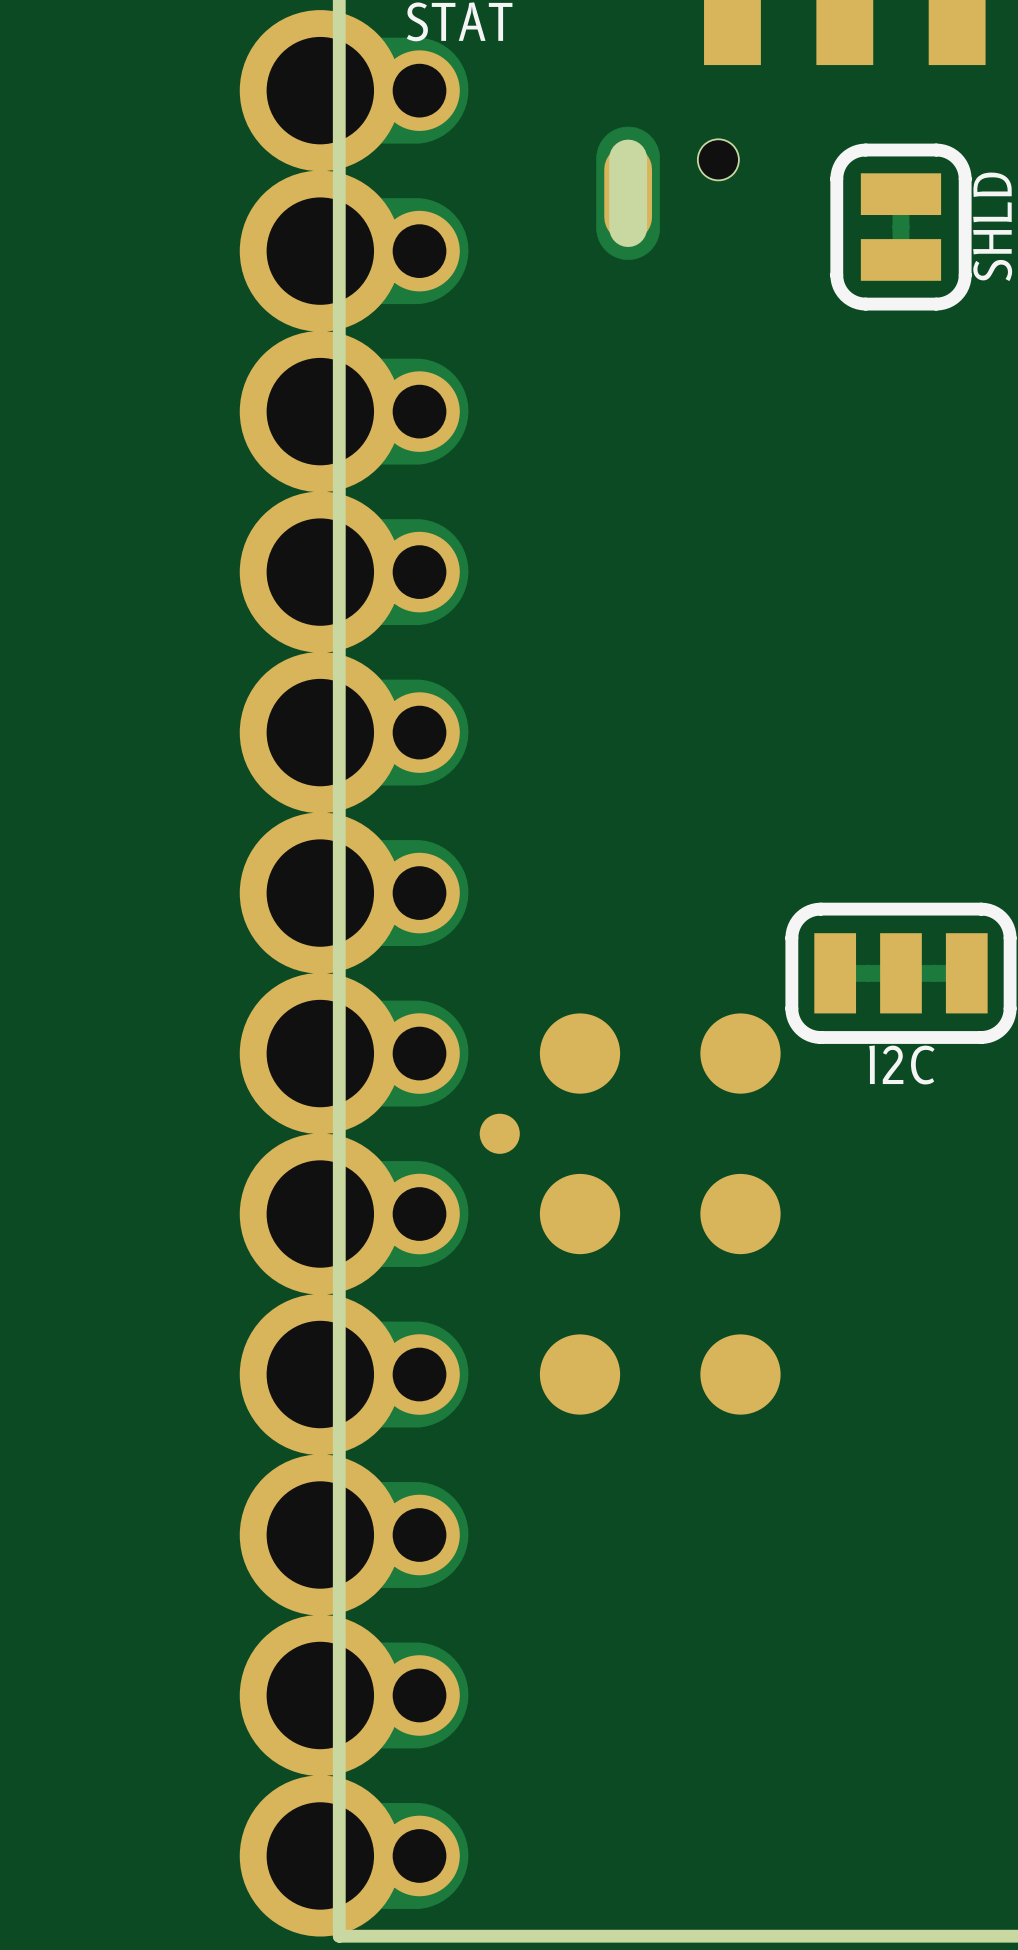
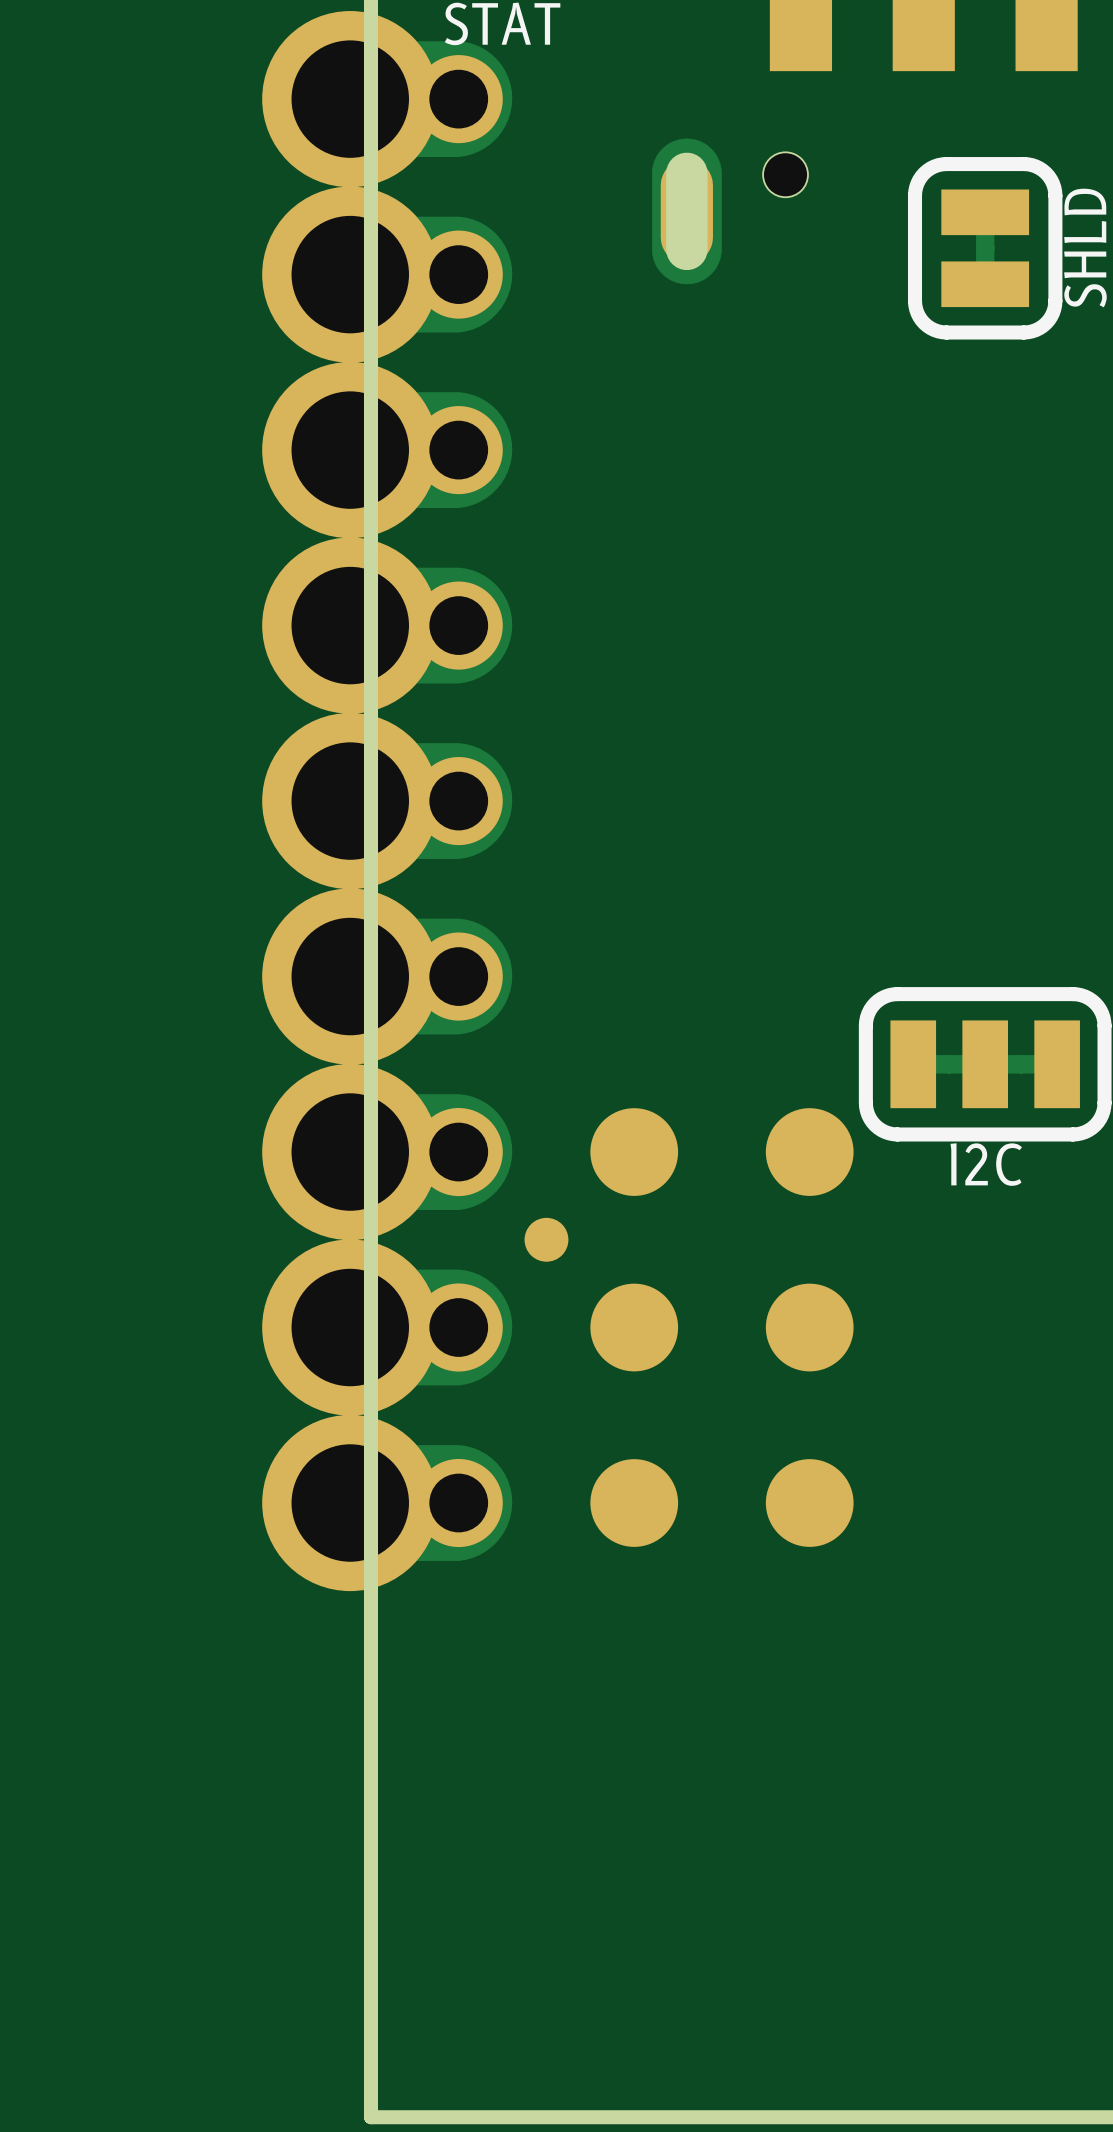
part: none -> (387, 801)
part: (354, 973) -> none

